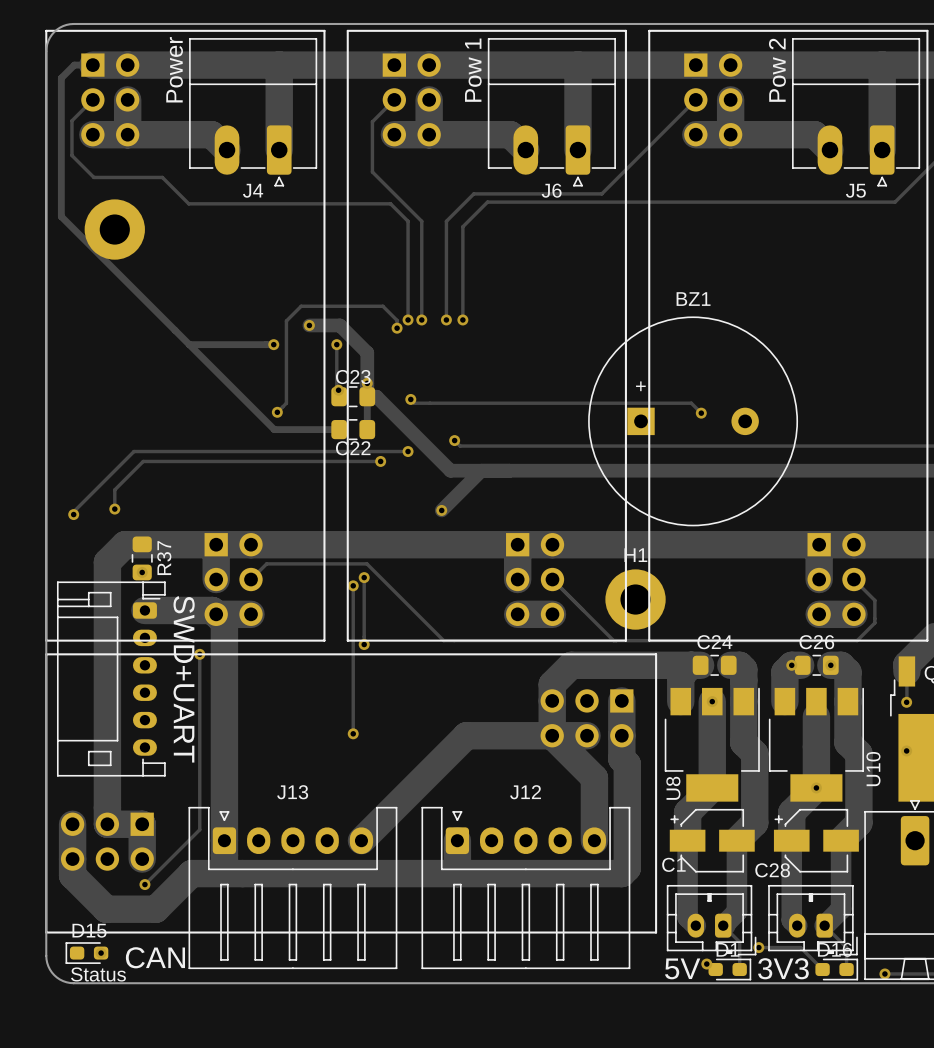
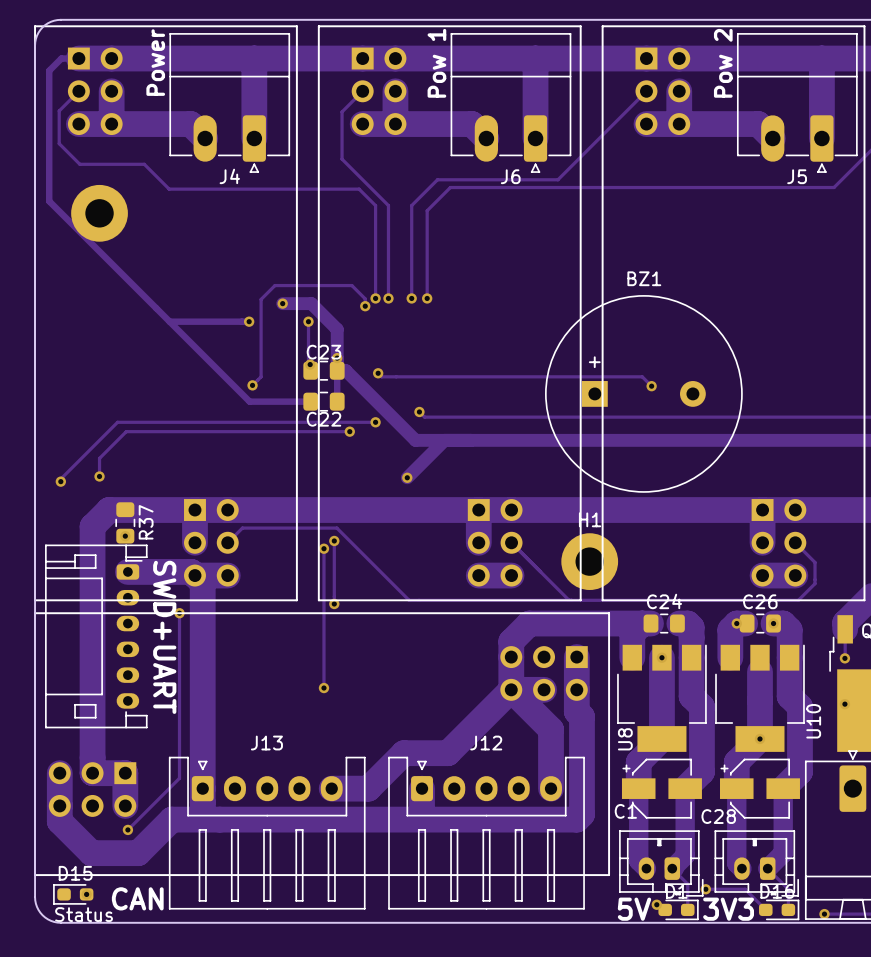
track: (552, 735) (466, 735) (361, 840) -> (511, 689) (447, 753) (403, 753) (368, 788) (331, 788)

